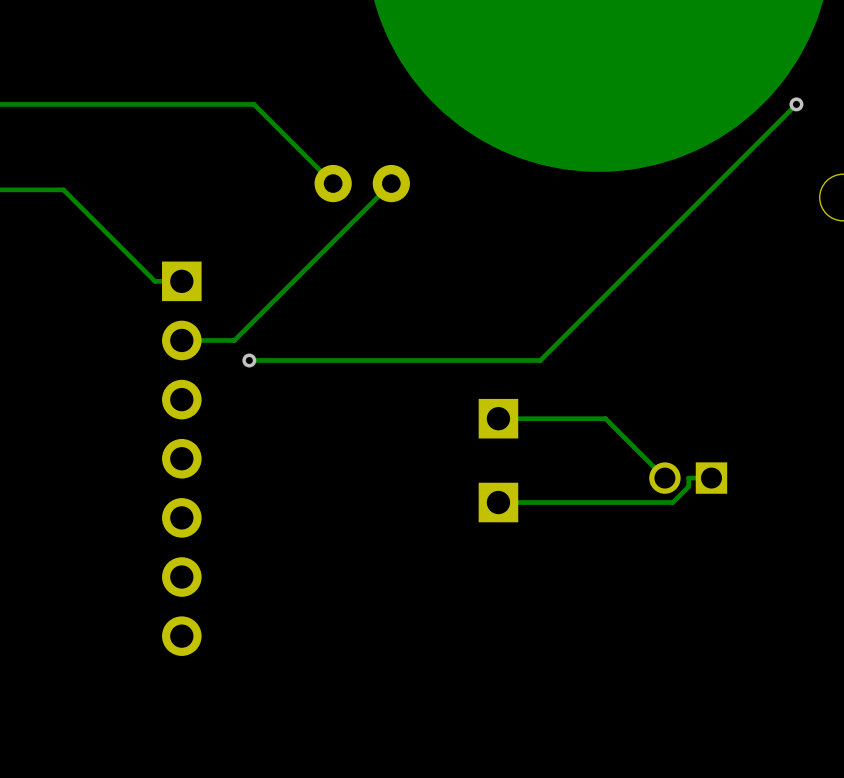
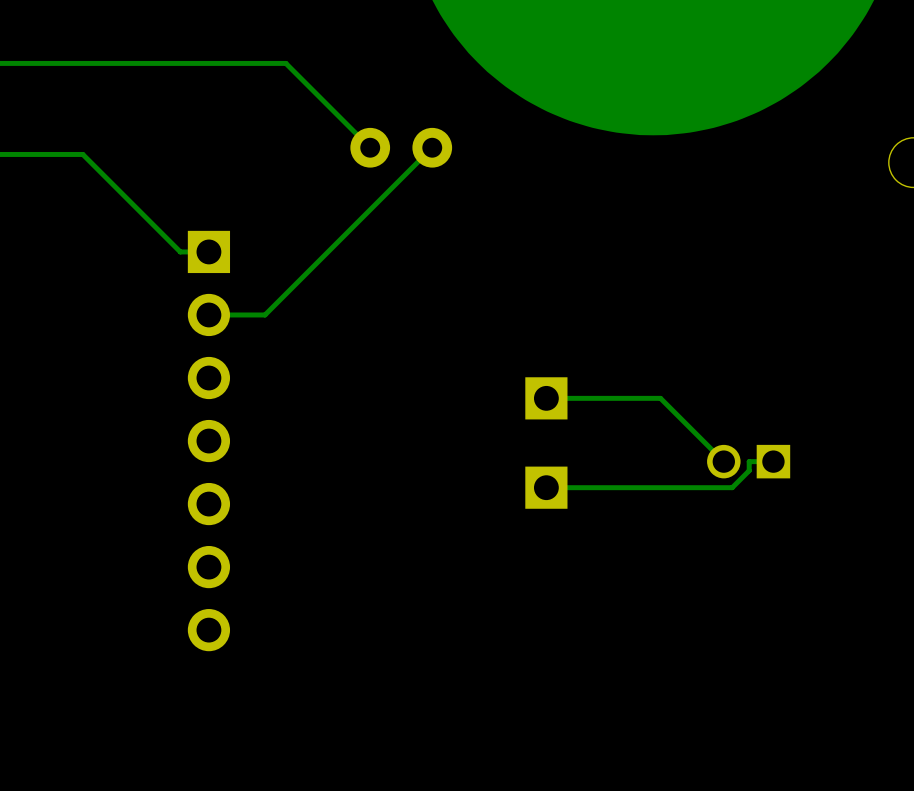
track: (796, 104) (540, 360) (249, 360) -> none
via: (796, 104) -> none
via: (249, 360) -> none

